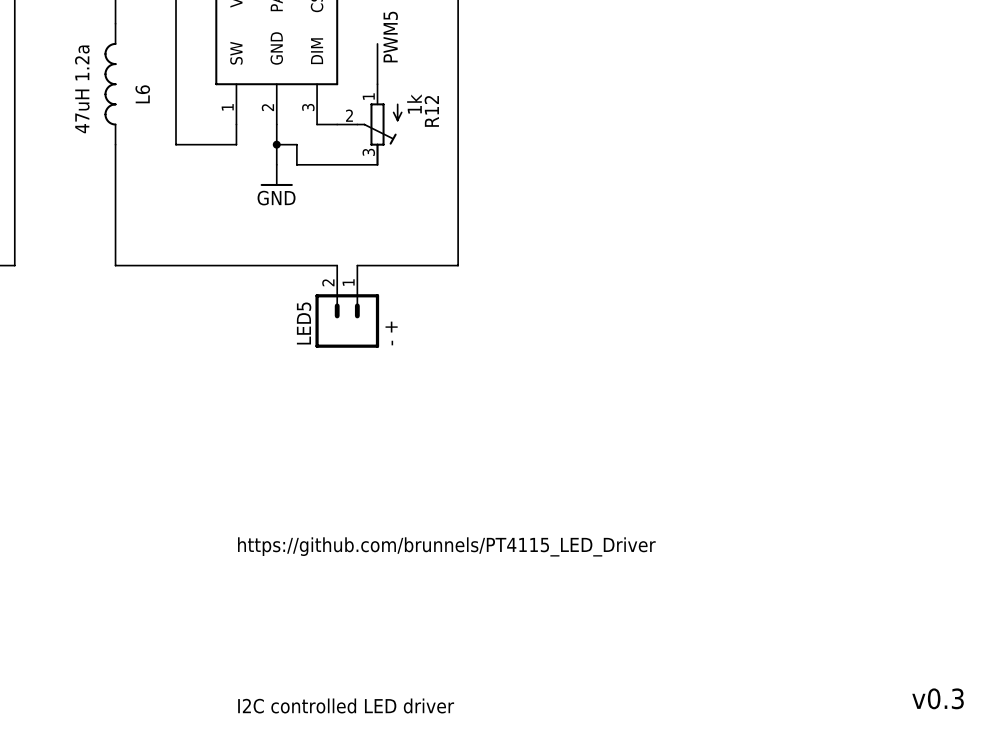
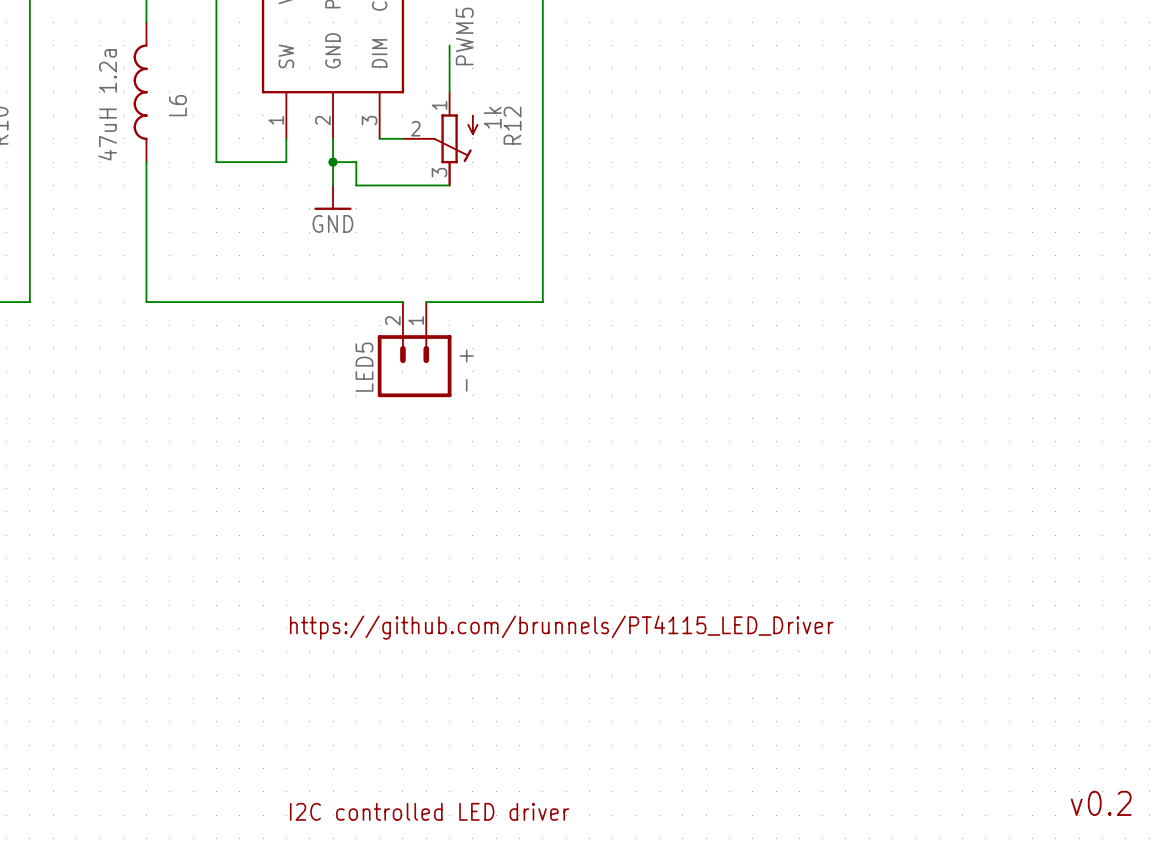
text: v0.3 (938, 698) -> v0.2 (1101, 803)

